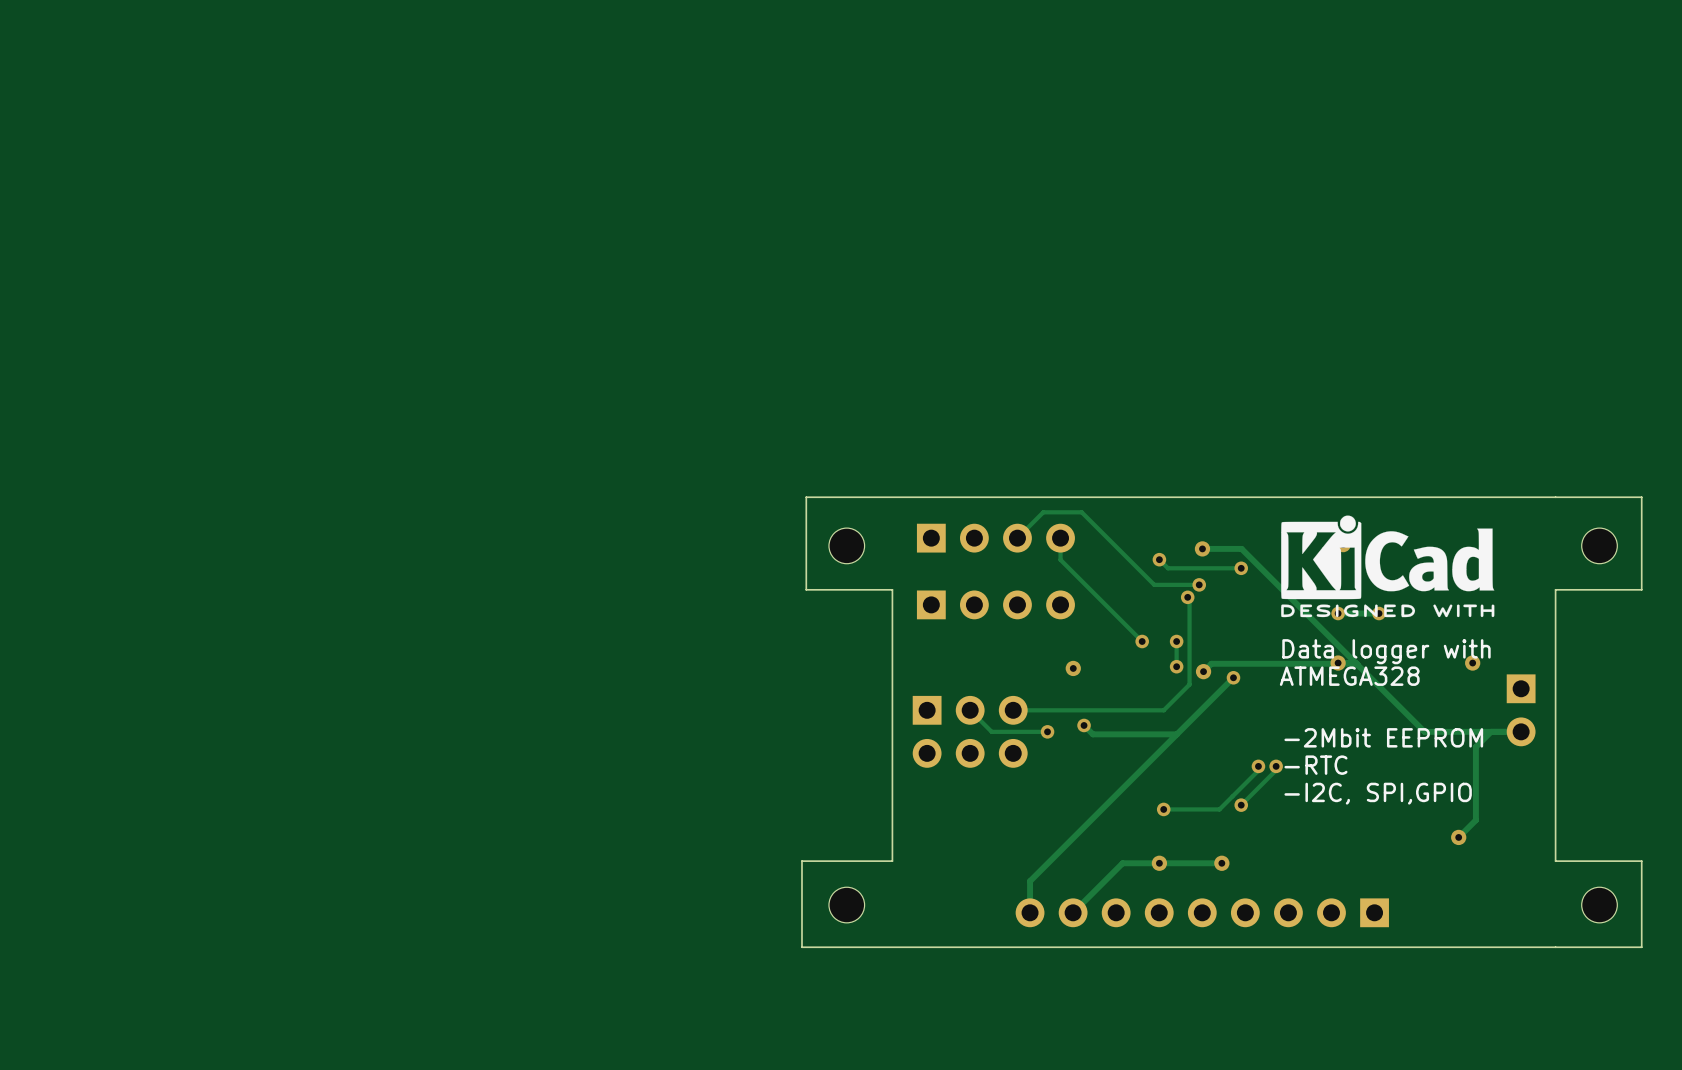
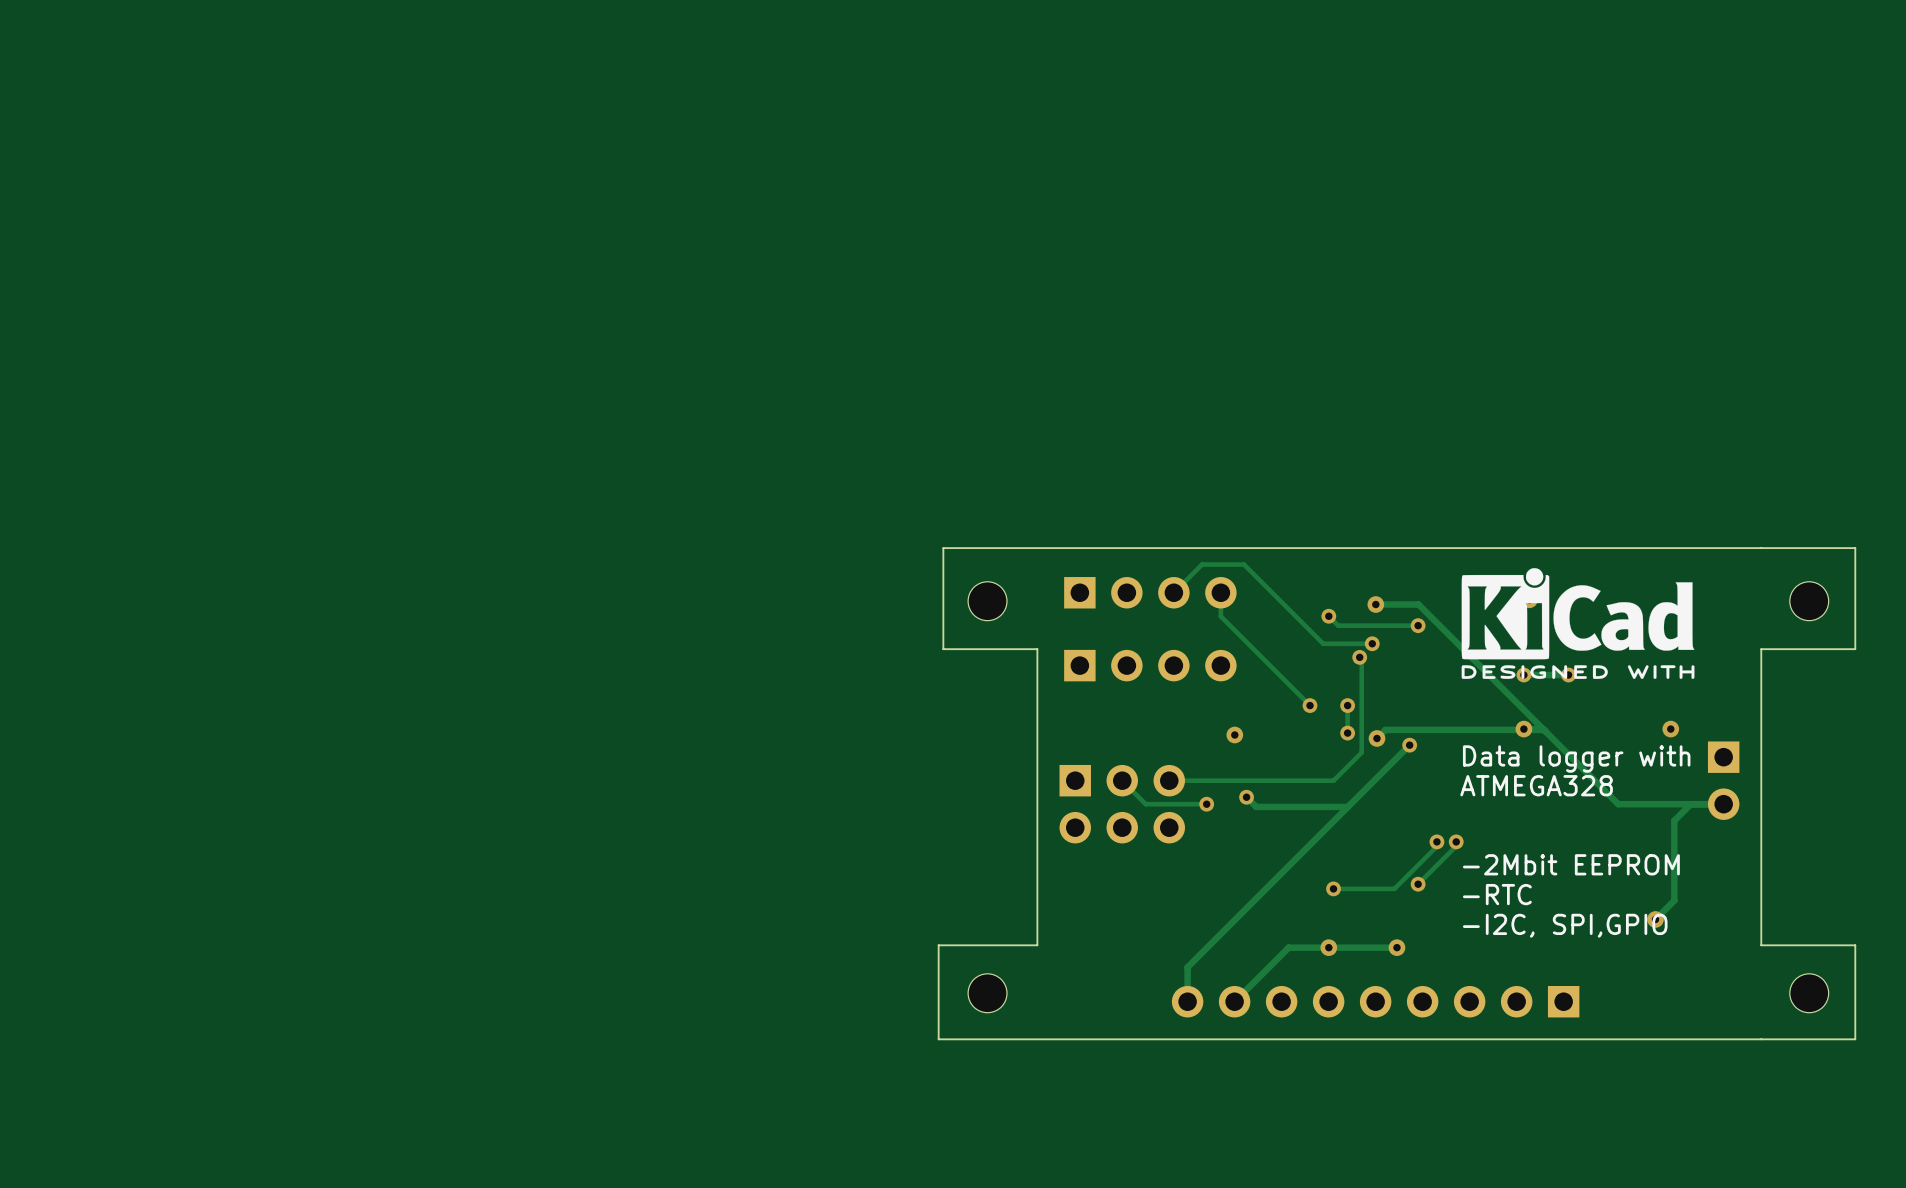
text: Data logger with (1386, 651) -> none
text: ATMEGA328 (1349, 676) -> Data logger with (1576, 759)
text: none -> ATMEGA328 (1536, 785)
text: -2Mbit EEPROM (1383, 737) -> none
text position: -RTC (1315, 765) -> -RTC (1497, 894)
text: -I2C, SPI,GPIO (1378, 793) -> -2Mbit EEPROM (1571, 864)
text: none -> -I2C, SPI,GPIO (1565, 925)

